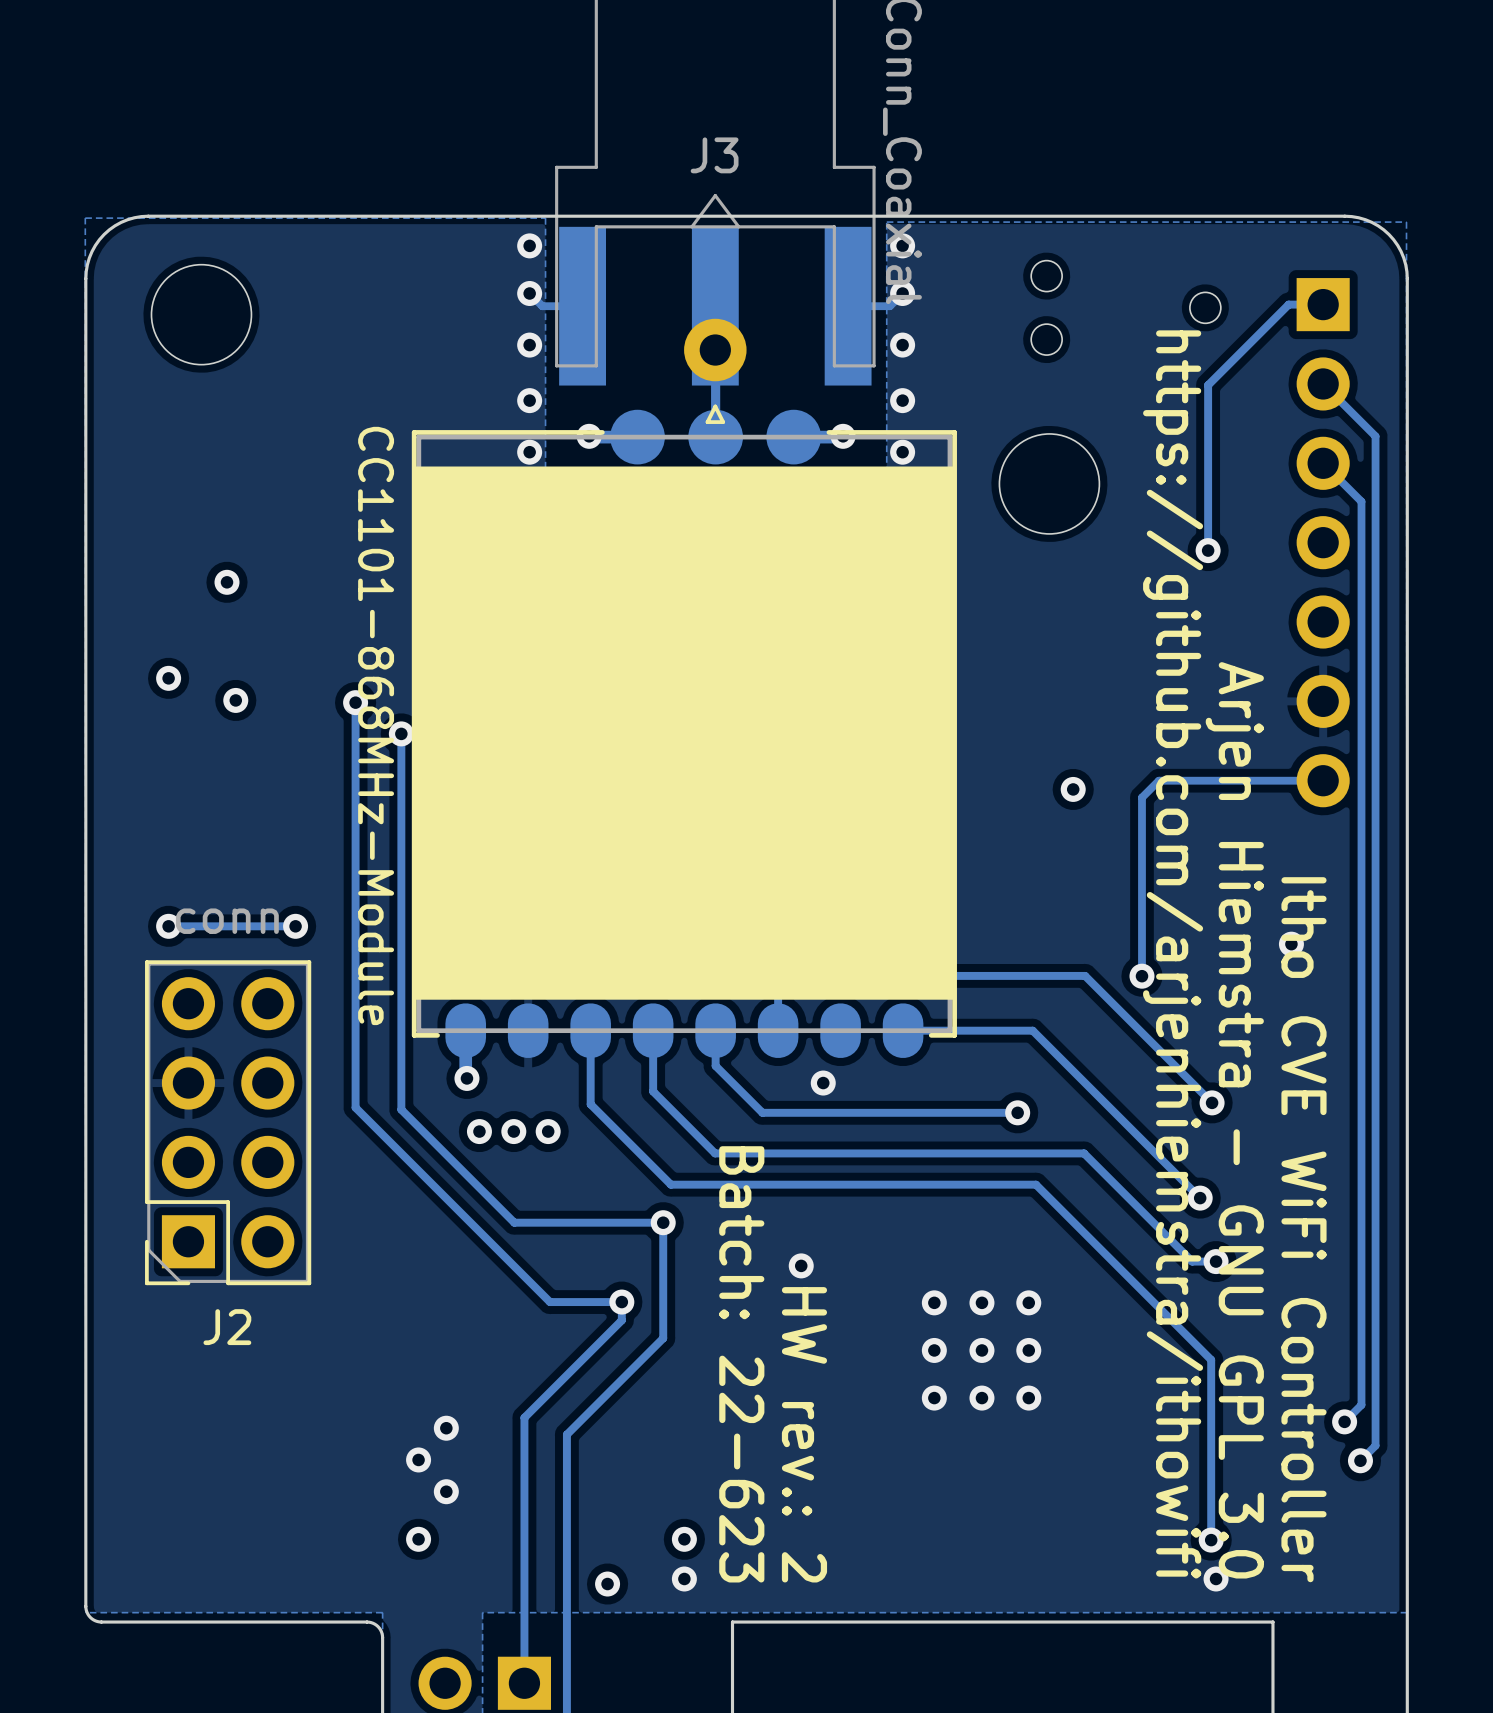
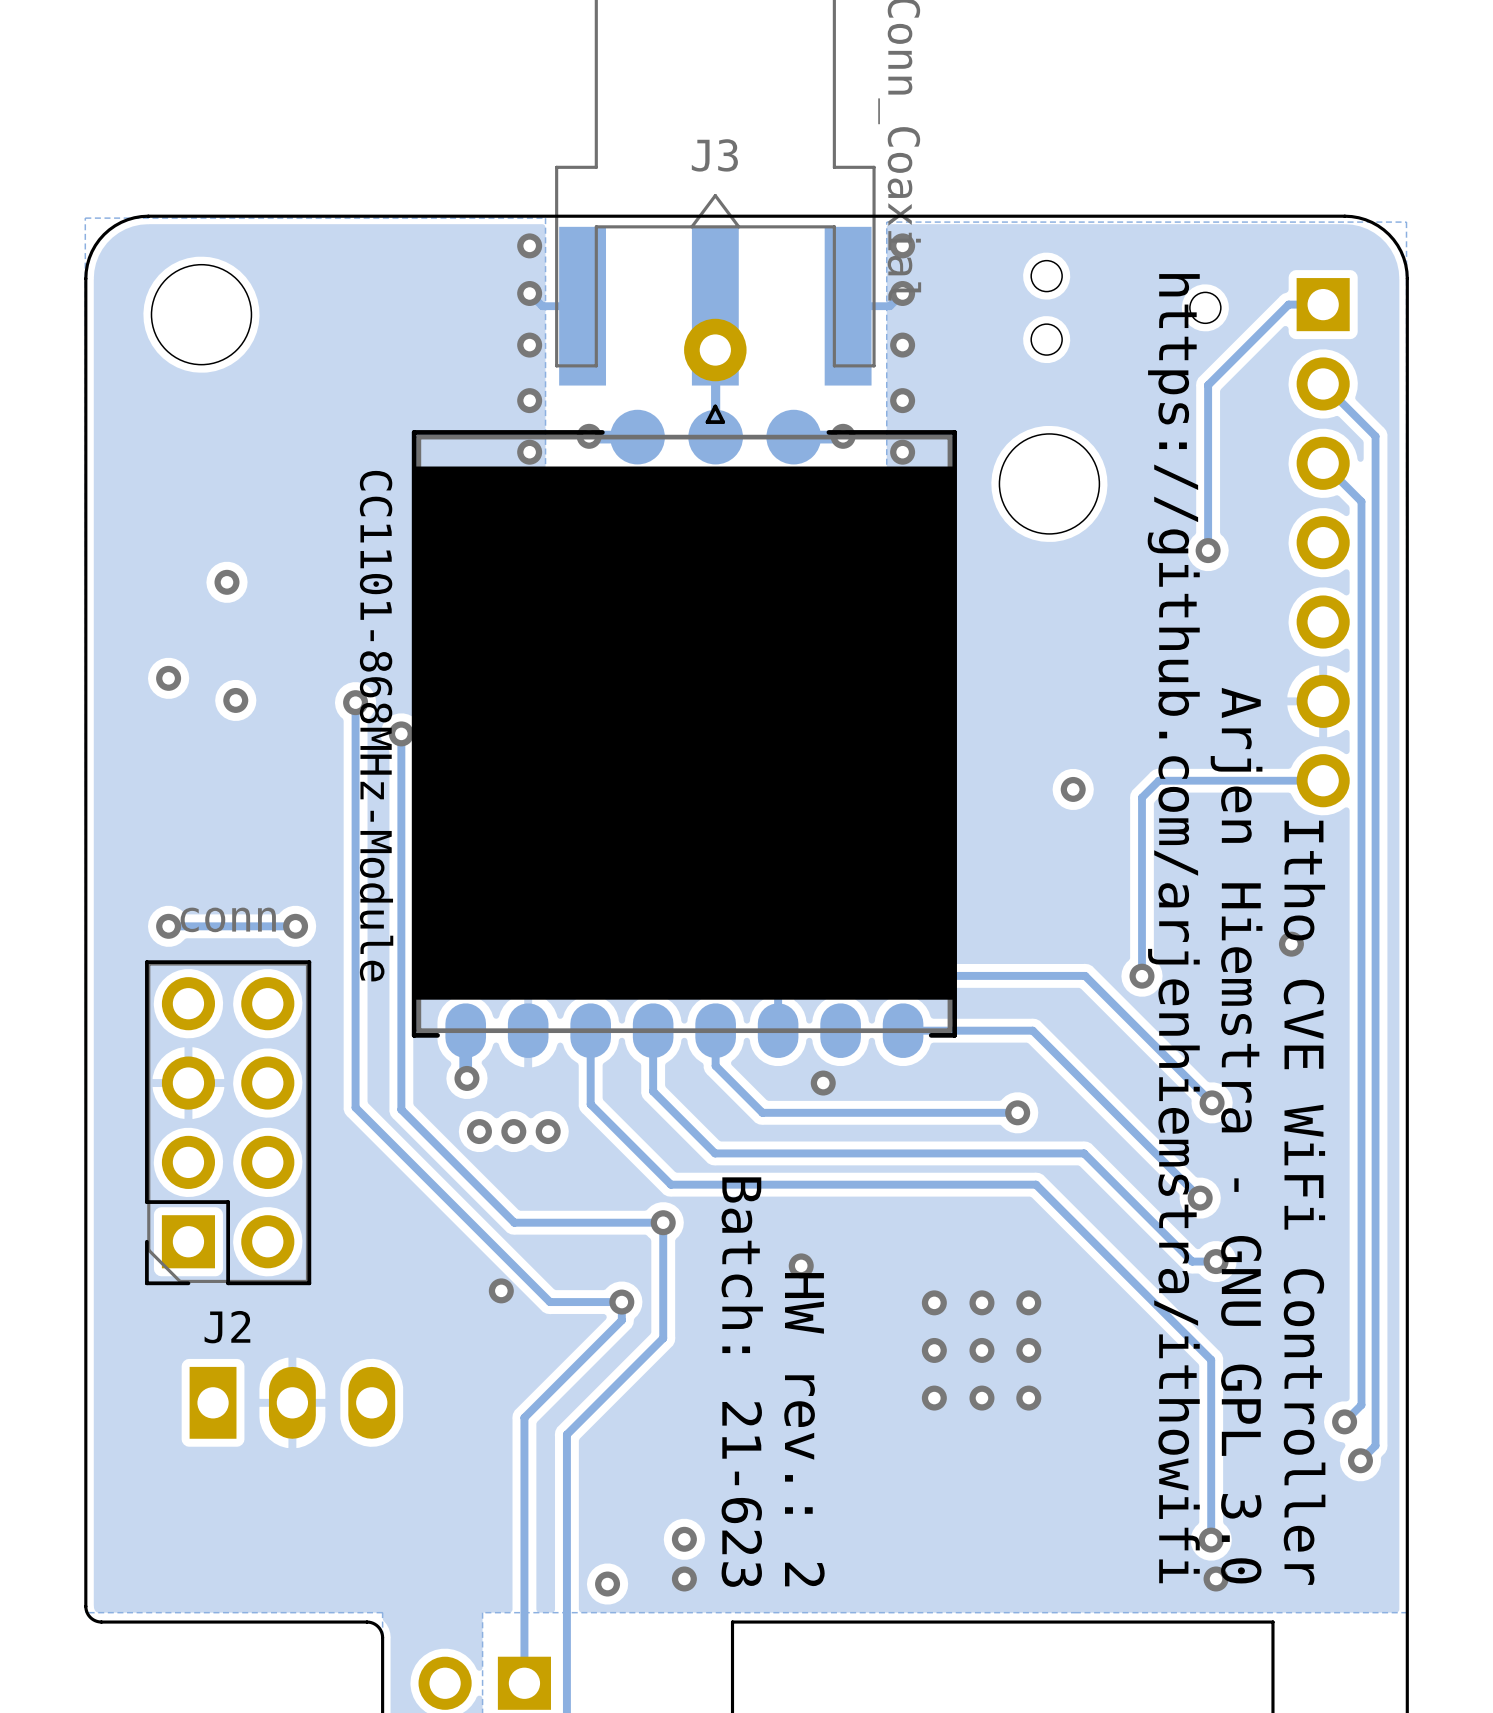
via: none -> (501, 1290)
text: Batch: 22-623 (741, 1364) -> Batch: 21-623 (742, 1382)
part: none -> (292, 1402)
via: (446, 1428) -> none
via: (418, 1459) -> none
via: (446, 1491) -> none
via: (418, 1539) -> none

